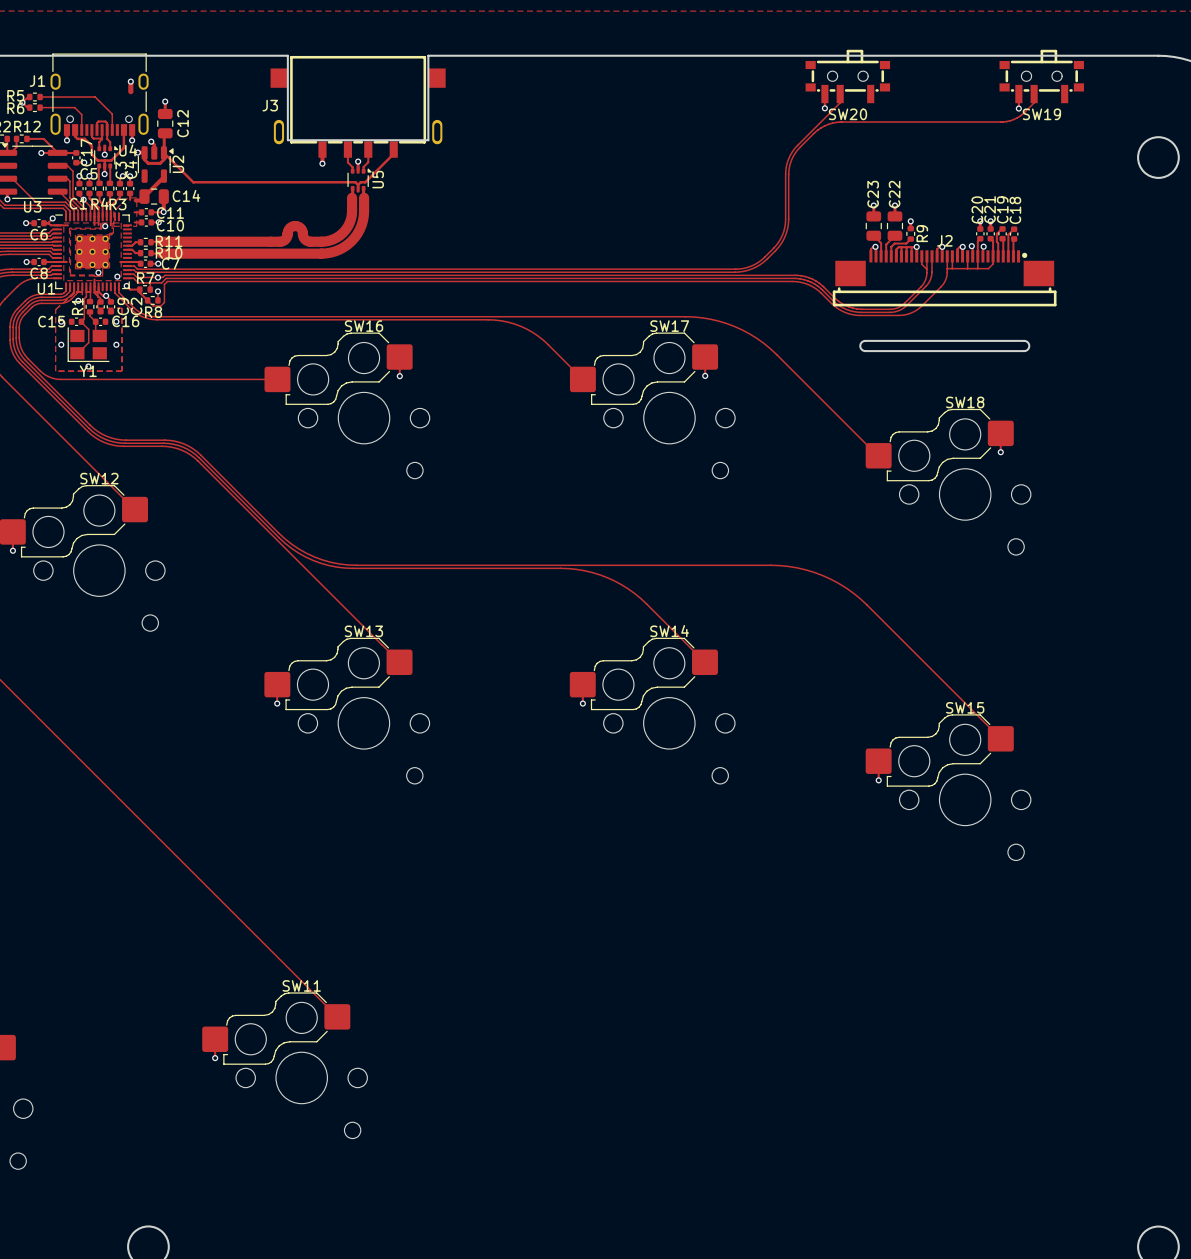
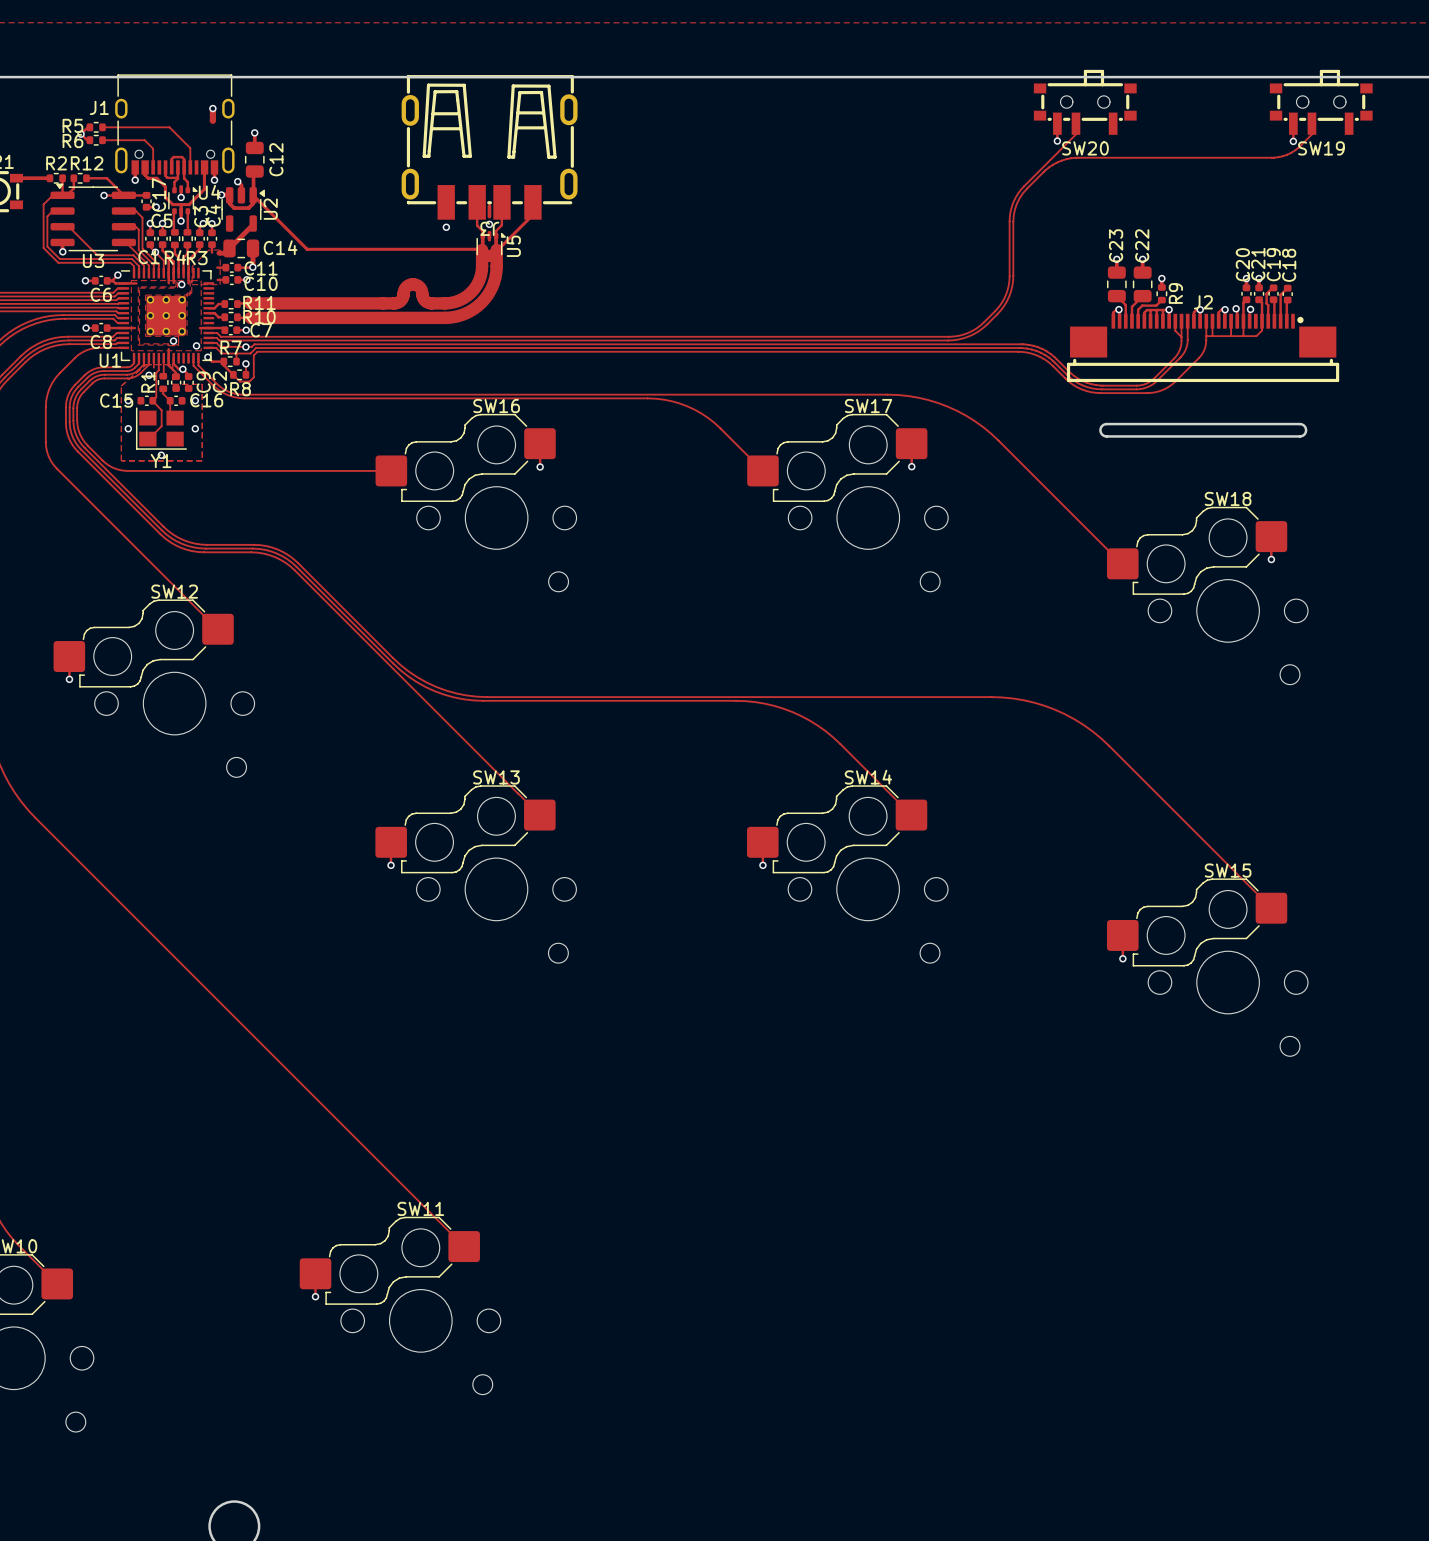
J3 footprint: [270, 54, 446, 158] -> [401, 75, 578, 220]
board edge: none -> (403, 77) (574, 77)
J3 name position: J3 (270, 105) -> J3 (489, 228)
track: (347, 149) (347, 162) (352, 167) (352, 171) -> none
track: (368, 149) (368, 162) (363, 167) (363, 171) -> (501, 209) (501, 225) (496, 231) (496, 236)
track: (393, 149) (392, 154) (365, 182) (360, 182) (358, 184) (355, 182) (193, 182) -> (489, 252) (485, 249) (307, 249) (288, 231)
track: none -> (477, 202) (477, 225) (482, 231) (482, 236)
track: none -> (532, 202) (532, 214) (498, 249) (492, 249) (489, 252)
via position: (358, 161) -> (489, 224)
via position: (322, 163) -> (446, 227)
U5 position: (359, 179) -> (491, 246)

